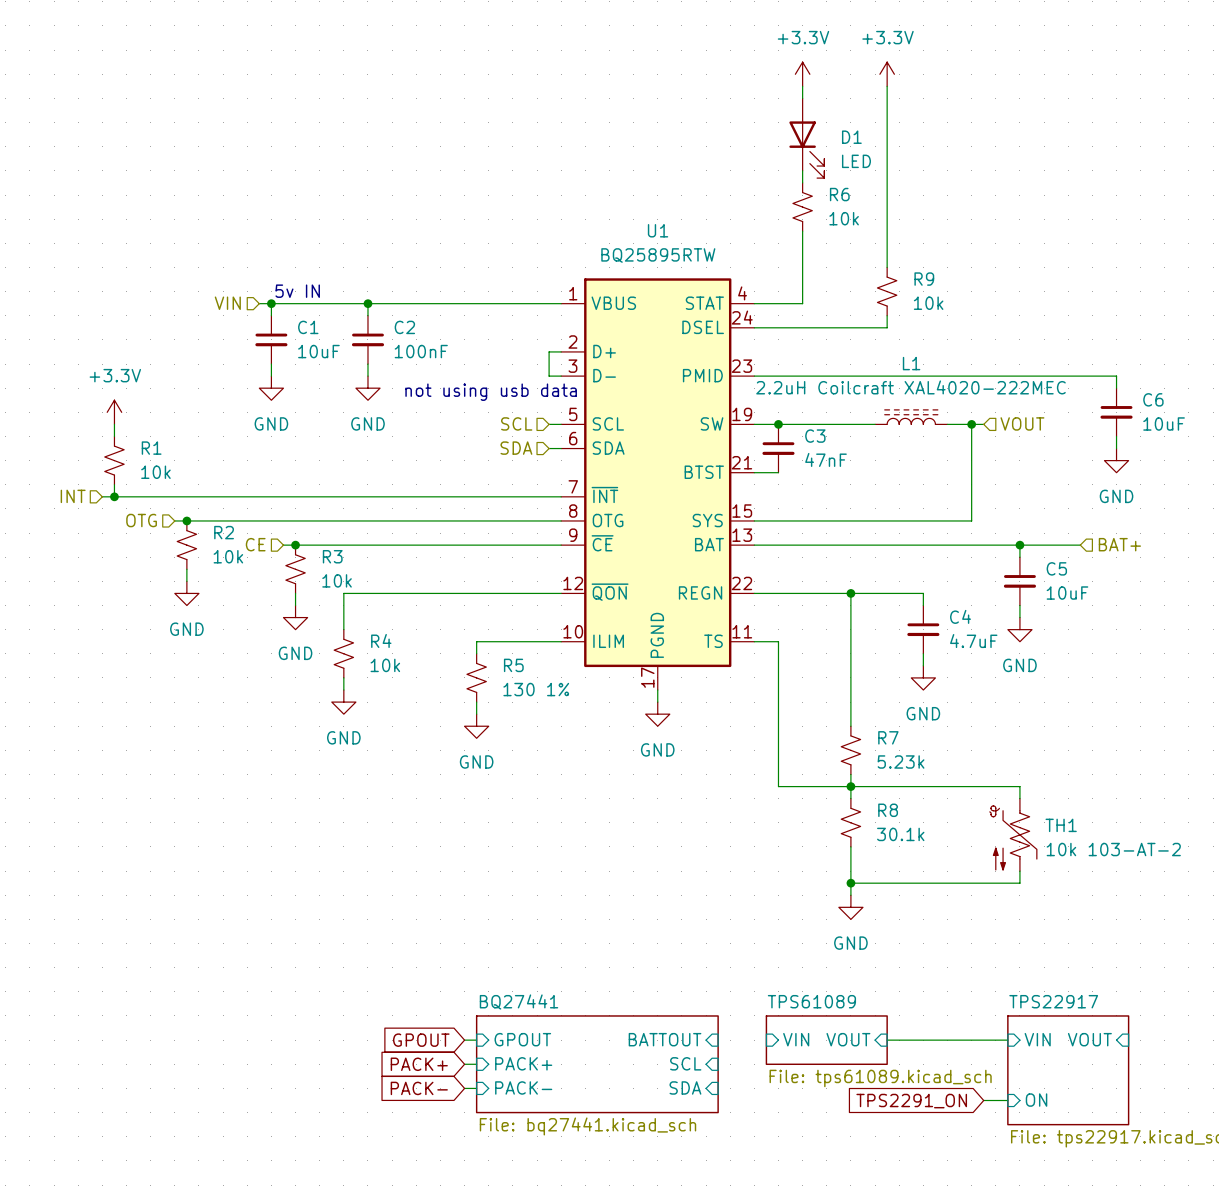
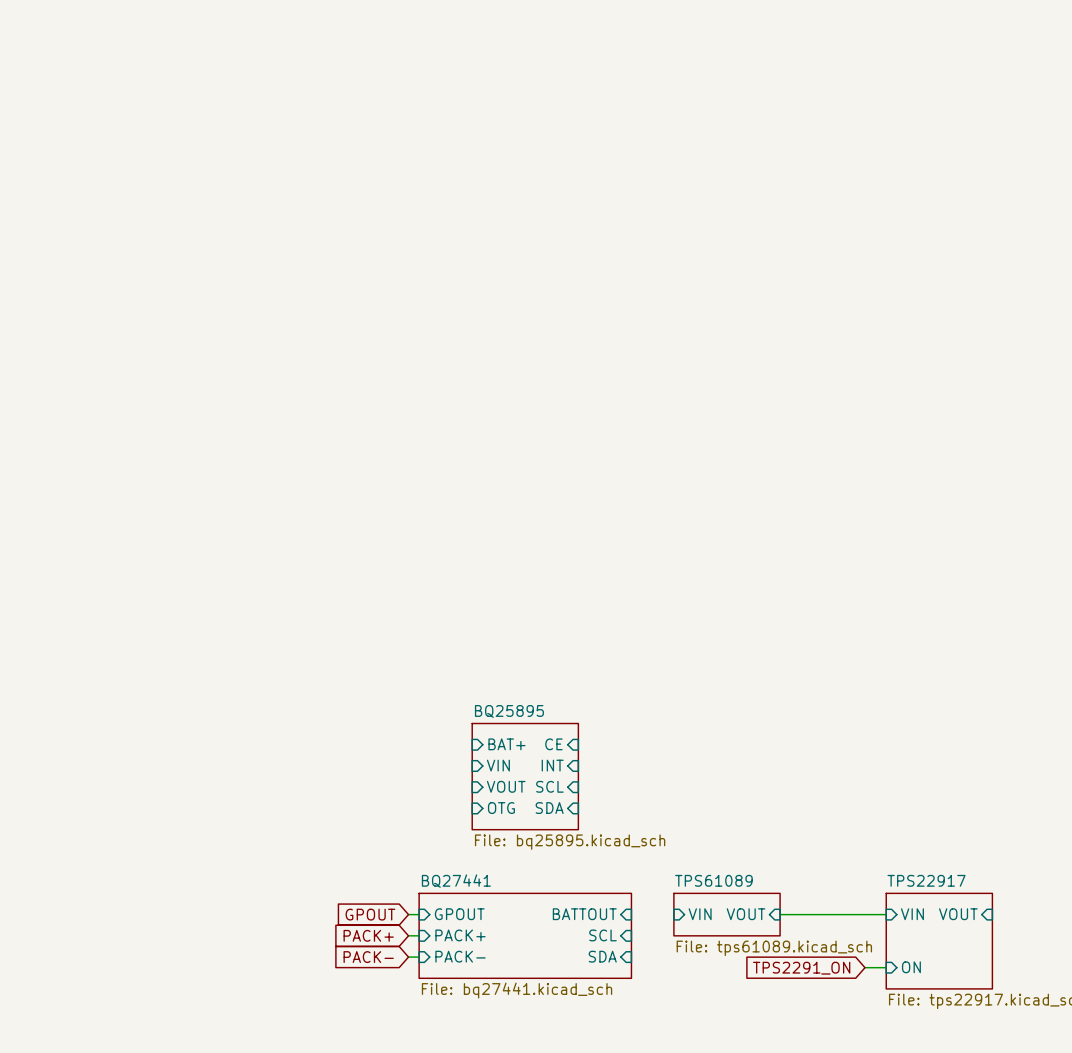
power symbol: +3.3V (802, 74) -> none
power symbol: +3.3V (887, 74) -> none
wire: (802, 86) (802, 98) -> none
wire: (887, 86) (887, 267) -> none
D1: LED (806, 138) -> none
wire: (802, 170) (802, 182) -> none
R6: 10k (802, 207) -> none
wire: (802, 231) (802, 303) (754, 303) -> none
text: 5v IN (297, 291) -> none
R9: 10k (887, 291) -> none
hierarchical label: VIN (227, 303) -> none
wire: (259, 303) (561, 303) -> none
wire: (271, 303) (271, 315) -> none
junction: (271, 303) -> none
wire: (367, 303) (367, 315) -> none
junction: (367, 303) -> none
wire: (887, 315) (887, 327) (754, 327) -> none
C1: 10uF (271, 339) -> none
C2: 100nF (367, 339) -> none
wire: (561, 351) (549, 351) (549, 376) (561, 376) -> none
wire: (271, 364) (271, 376) -> none
wire: (367, 364) (367, 376) -> none
wire: (754, 376) (1116, 376) (1116, 388) -> none
power symbol: GND (271, 388) -> none
power symbol: GND (367, 388) -> none
text: not using usb data (491, 392) -> none
power symbol: +3.3V (114, 412) -> none
C6: 10uF (1116, 412) -> none
L1: 2.2uH Coilcraft XAL4020-222MEC (911, 417) -> none
hierarchical label: SCL (516, 423) -> none
hierarchical label: VOUT (1022, 423) -> none
wire: (114, 424) (114, 436) -> none
wire: (549, 424) (561, 424) -> none
wire: (754, 424) (875, 424) -> none
junction: (778, 424) -> none
wire: (947, 424) (983, 424) -> none
wire: (971, 424) (971, 520) (754, 520) -> none
junction: (971, 424) -> none
wire: (1116, 436) (1116, 448) -> none
hierarchical label: SDA (516, 448) -> none
wire: (549, 448) (561, 448) -> none
C3: 47nF (778, 448) -> none
R1: 10k (114, 460) -> none
power symbol: GND (1116, 460) -> none
wire: (754, 472) (778, 472) -> none
wire: (114, 484) (114, 496) -> none
U1: BQ25895RTW (657, 484) -> none
hierarchical label: INT (73, 496) -> none
wire: (102, 496) (561, 496) -> none
junction: (114, 496) -> none
hierarchical label: OTG (141, 520) -> none
wire: (174, 520) (561, 520) -> none
junction: (186, 520) -> none
hierarchical label: CE (255, 544) -> none
hierarchical label: BAT+ (1119, 544) -> none
R2: 10k (186, 545) -> none
wire: (283, 545) (561, 545) -> none
junction: (295, 545) -> none
wire: (754, 545) (1080, 545) -> none
wire: (1019, 545) (1019, 557) -> none
junction: (1019, 545) -> none
wire: (186, 569) (186, 581) -> none
R3: 10k (295, 569) -> none
C5: 10uF (1019, 581) -> none
power symbol: GND (186, 593) -> none
wire: (295, 593) (295, 605) -> none
wire: (561, 593) (343, 593) (343, 629) -> none
wire: (754, 593) (923, 593) (923, 605) -> none
wire: (850, 593) (850, 726) -> none
junction: (850, 593) -> none
wire: (1019, 605) (1019, 617) -> none
power symbol: GND (295, 617) -> none
C4: 4.7uF (923, 629) -> none
power symbol: GND (1019, 629) -> none
wire: (561, 641) (476, 641) (476, 653) -> none
wire: (754, 641) (778, 641) (778, 786) (1019, 786) (1019, 798) -> none
R4: 10k (343, 653) -> none
wire: (923, 653) (923, 665) -> none
wire: (343, 677) (343, 690) -> none
R5: 130 1% (476, 677) -> none
power symbol: GND (923, 677) -> none
wire: (657, 690) (657, 702) -> none
power symbol: GND (343, 702) -> none
wire: (476, 702) (476, 714) -> none
power symbol: GND (657, 714) -> none
power symbol: GND (476, 726) -> none
R7: 5.23k (850, 750) -> none
wire: (850, 774) (850, 798) -> none
junction: (850, 786) -> none
R8: 30.1k (850, 822) -> none
TH1: 10k 103-AT-2 (1013, 834) -> none
sheet pin: none -> BAT+ (507, 744)
sheet pin: none -> CE (553, 744)
wire: (850, 846) (850, 895) -> none
sheet pin: none -> VIN (498, 765)
sheet pin: none -> INT (552, 765)
wire: (1019, 871) (1019, 883) (850, 883) -> none
sheet BQ25895: none -> File: bq25895.kicad_sch (525, 776)
junction: (850, 883) -> none
sheet pin: none -> VOUT (506, 786)
sheet pin: none -> SCL (549, 786)
power symbol: GND (850, 907) -> none
sheet pin: none -> OTG (501, 808)
sheet pin: none -> SDA (549, 808)

